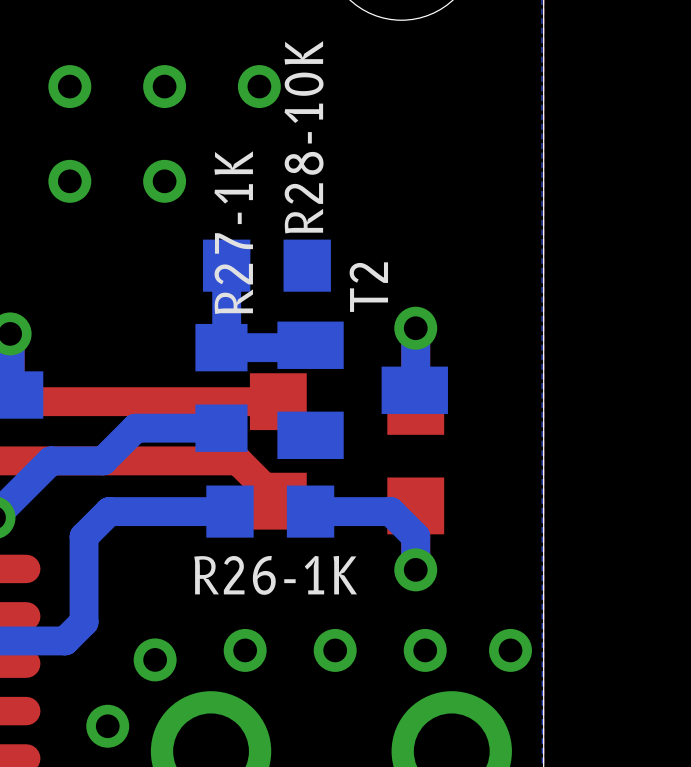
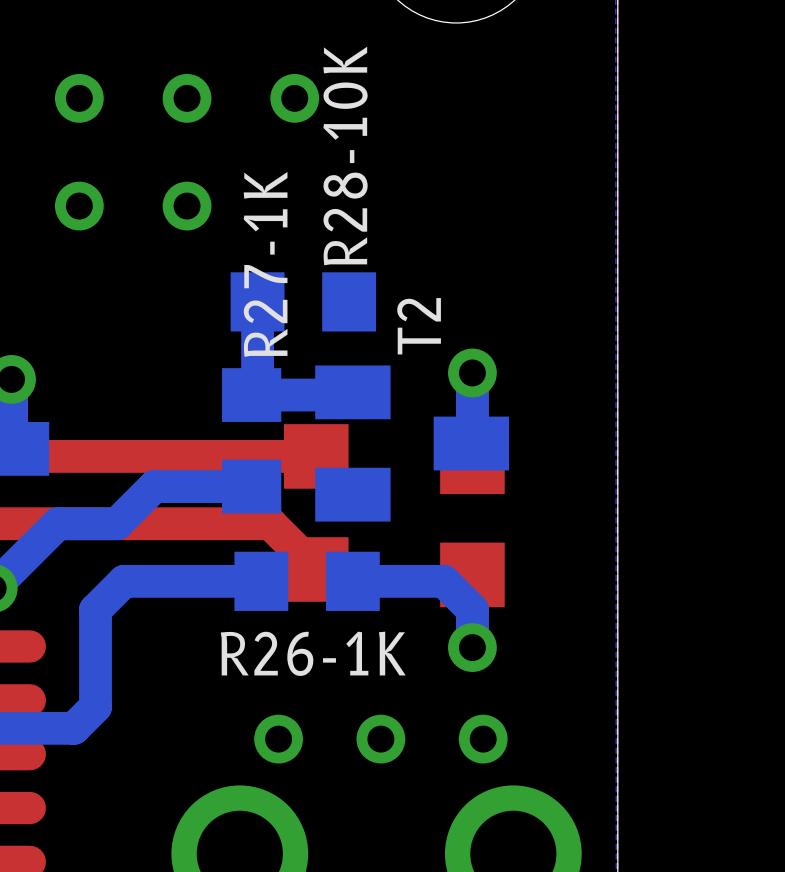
via: (510, 650) -> none
via: (155, 659) -> none
via: (107, 726) -> none

